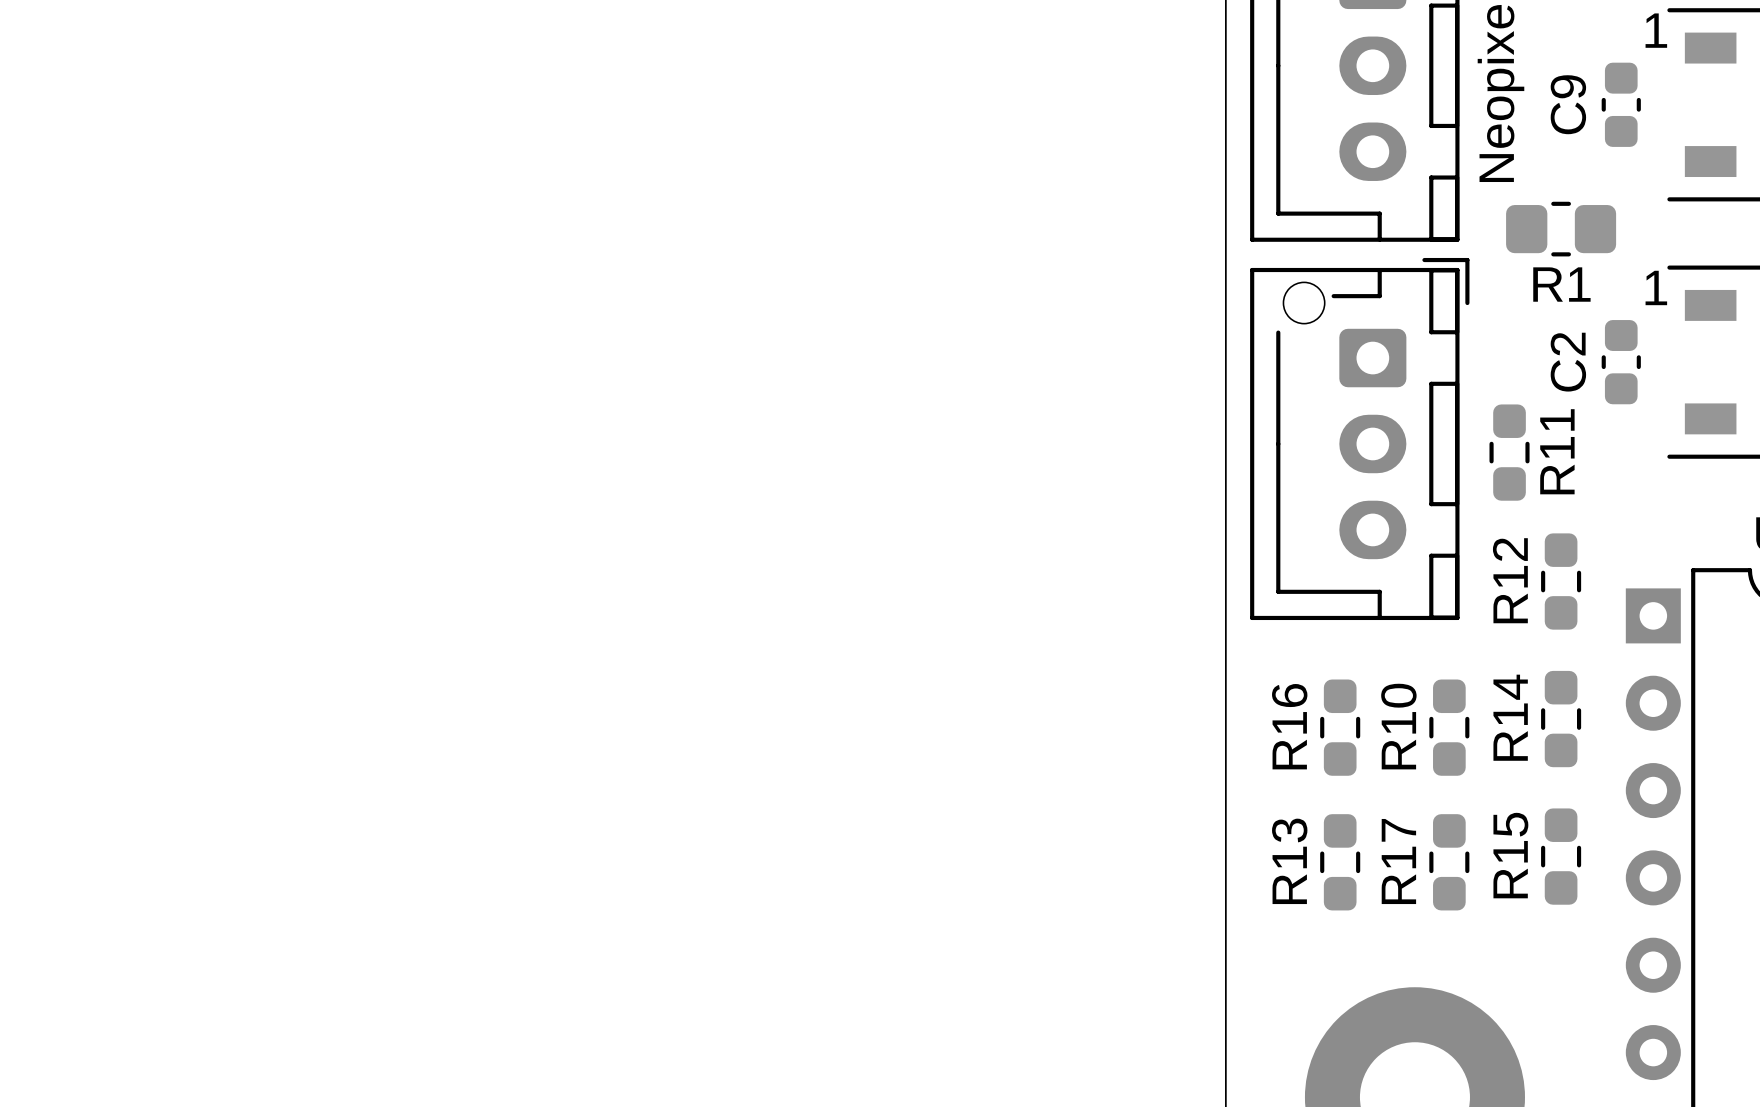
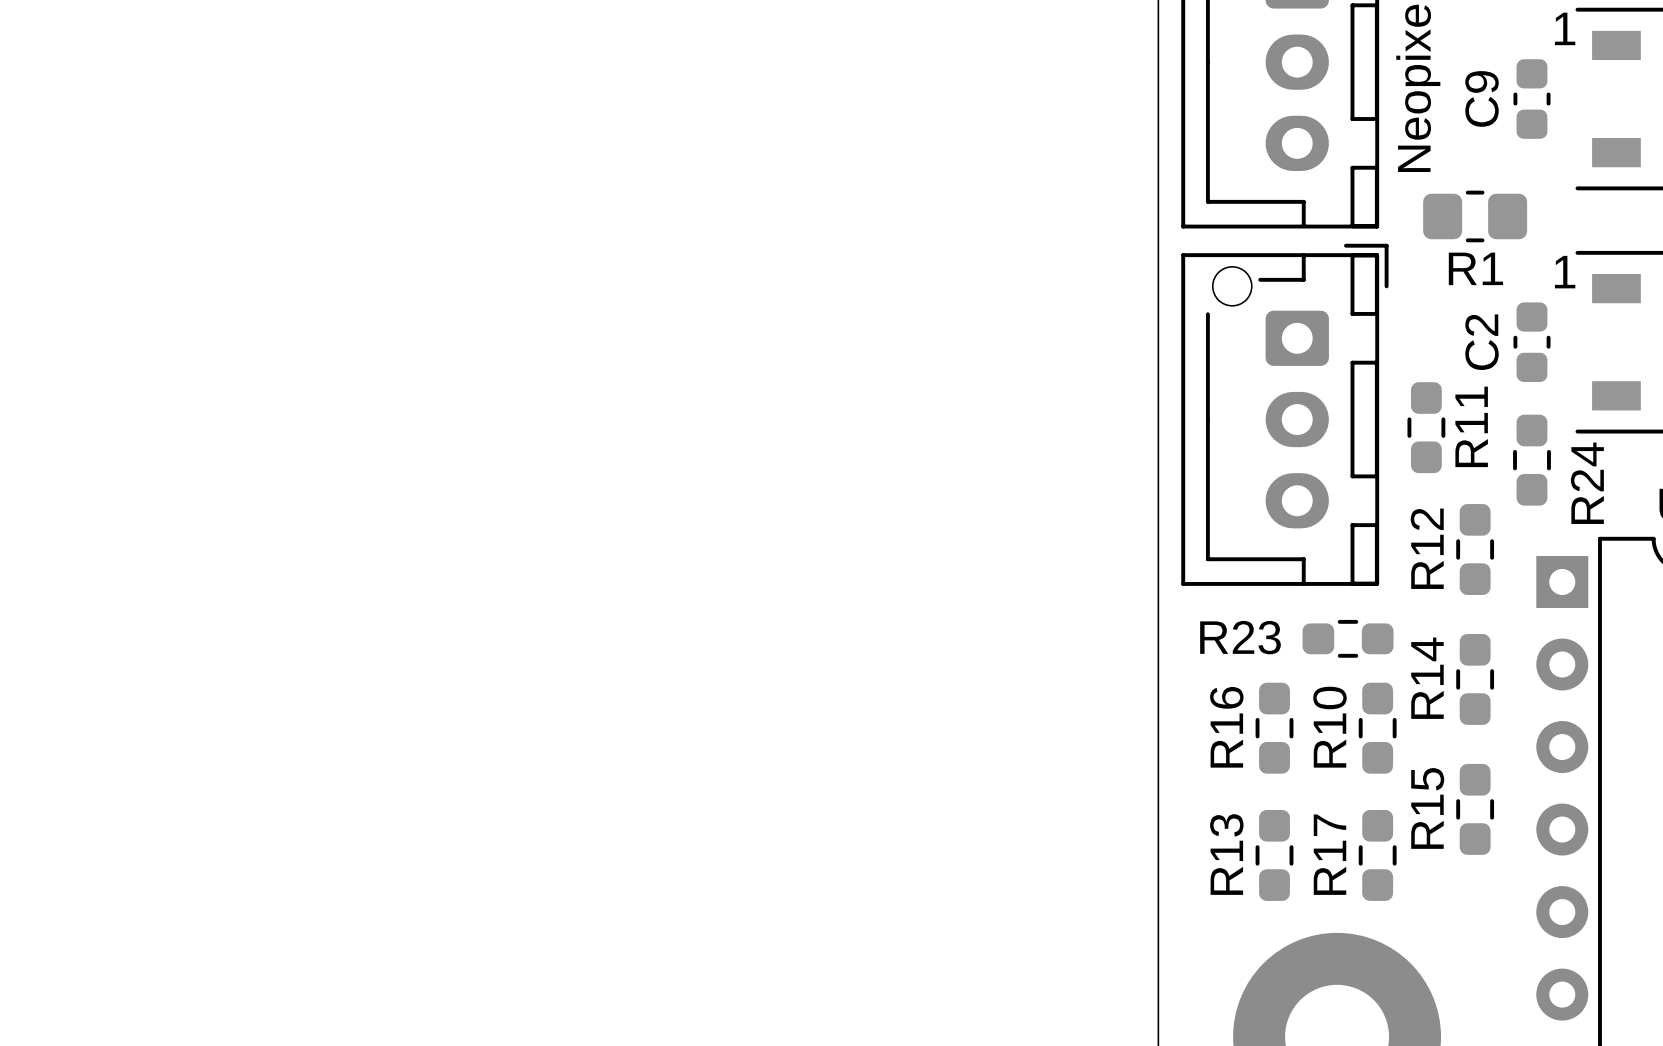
R24: none -> (1531, 460)
R23: none -> (1348, 638)
R16 position: (1340, 727) -> (1274, 728)
R10 position: (1449, 727) -> (1377, 728)
R13 position: (1340, 862) -> (1274, 855)
R17 position: (1449, 862) -> (1377, 855)

